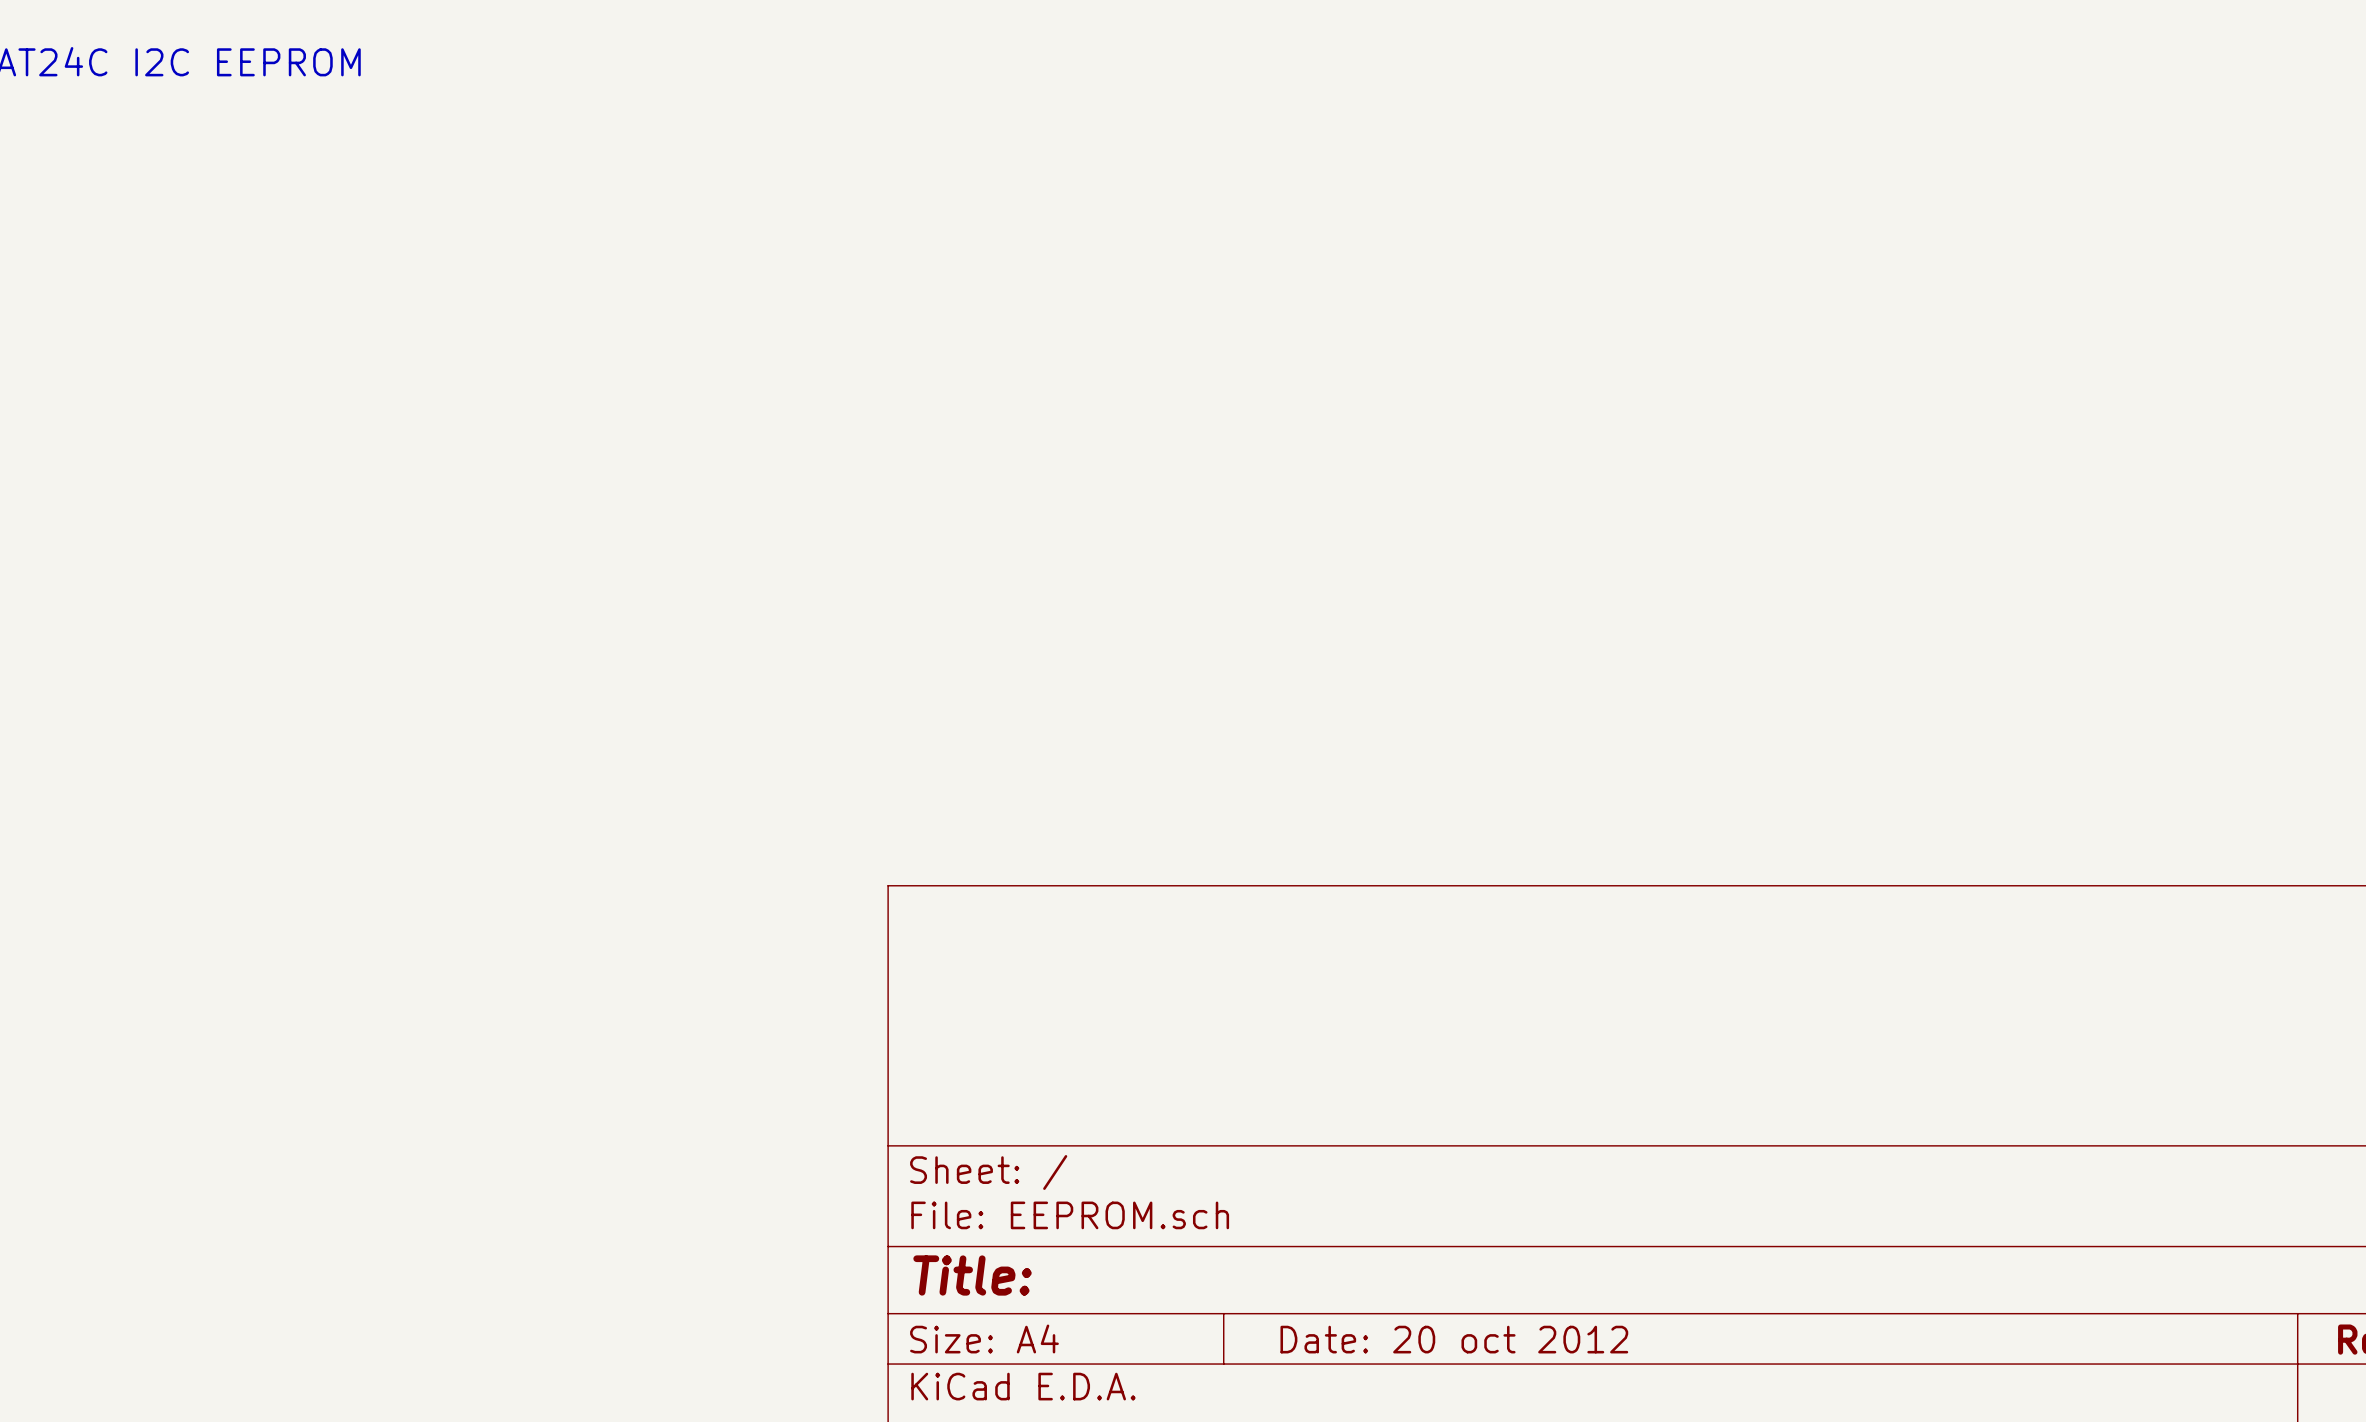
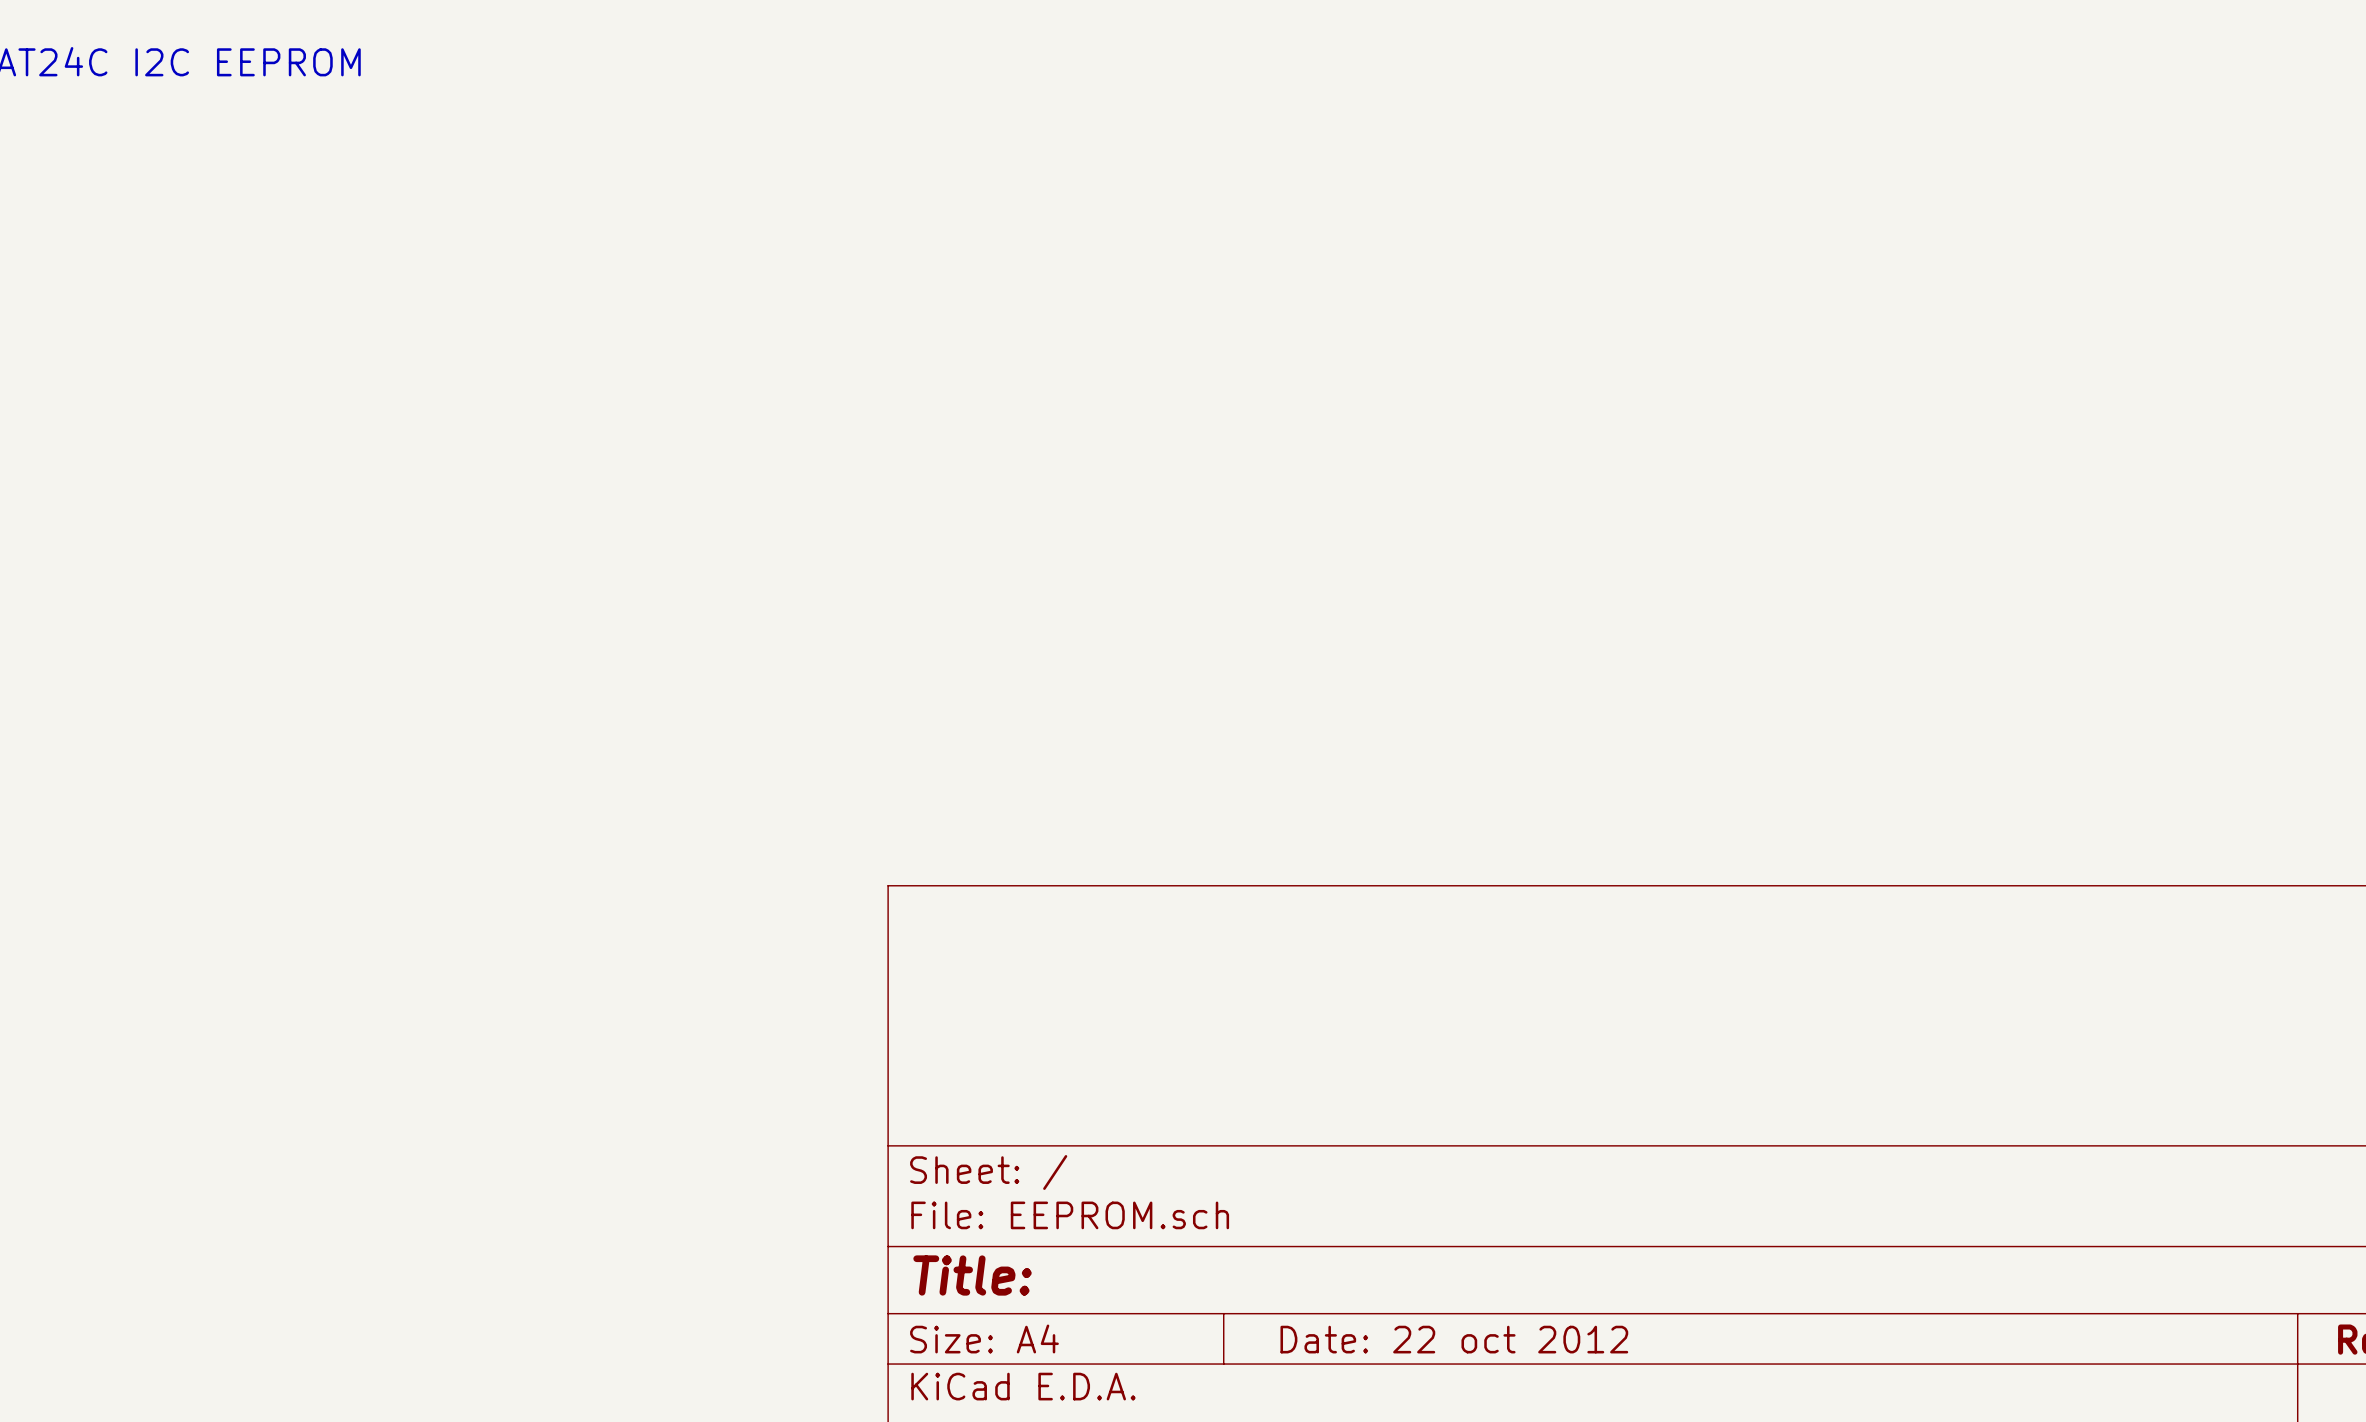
title block: Date: 20 oct 2012 (1454, 1339) -> Date: 22 oct 2012 (1454, 1339)

